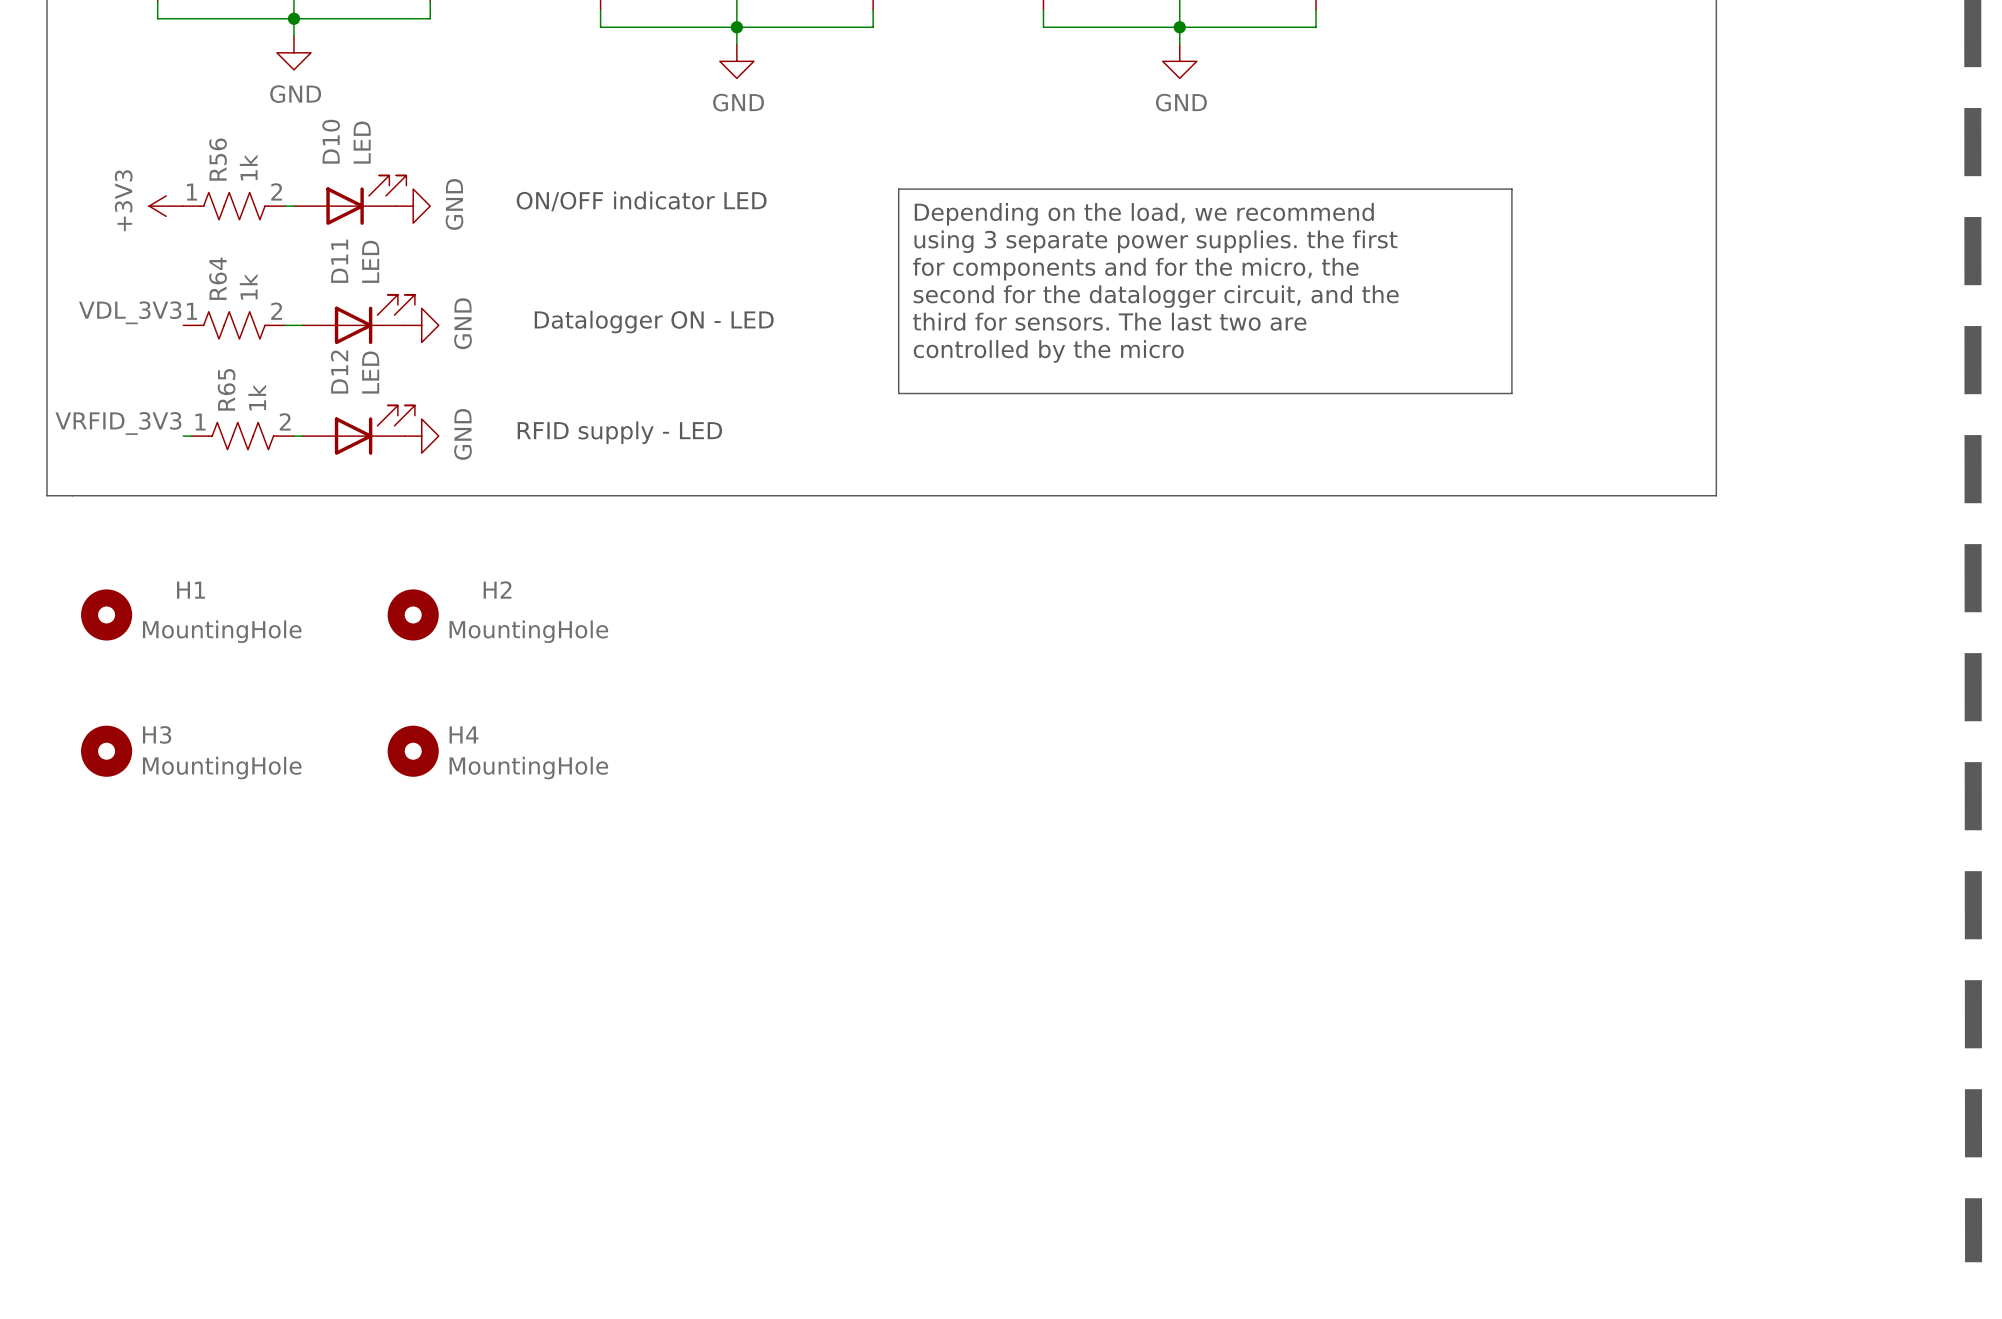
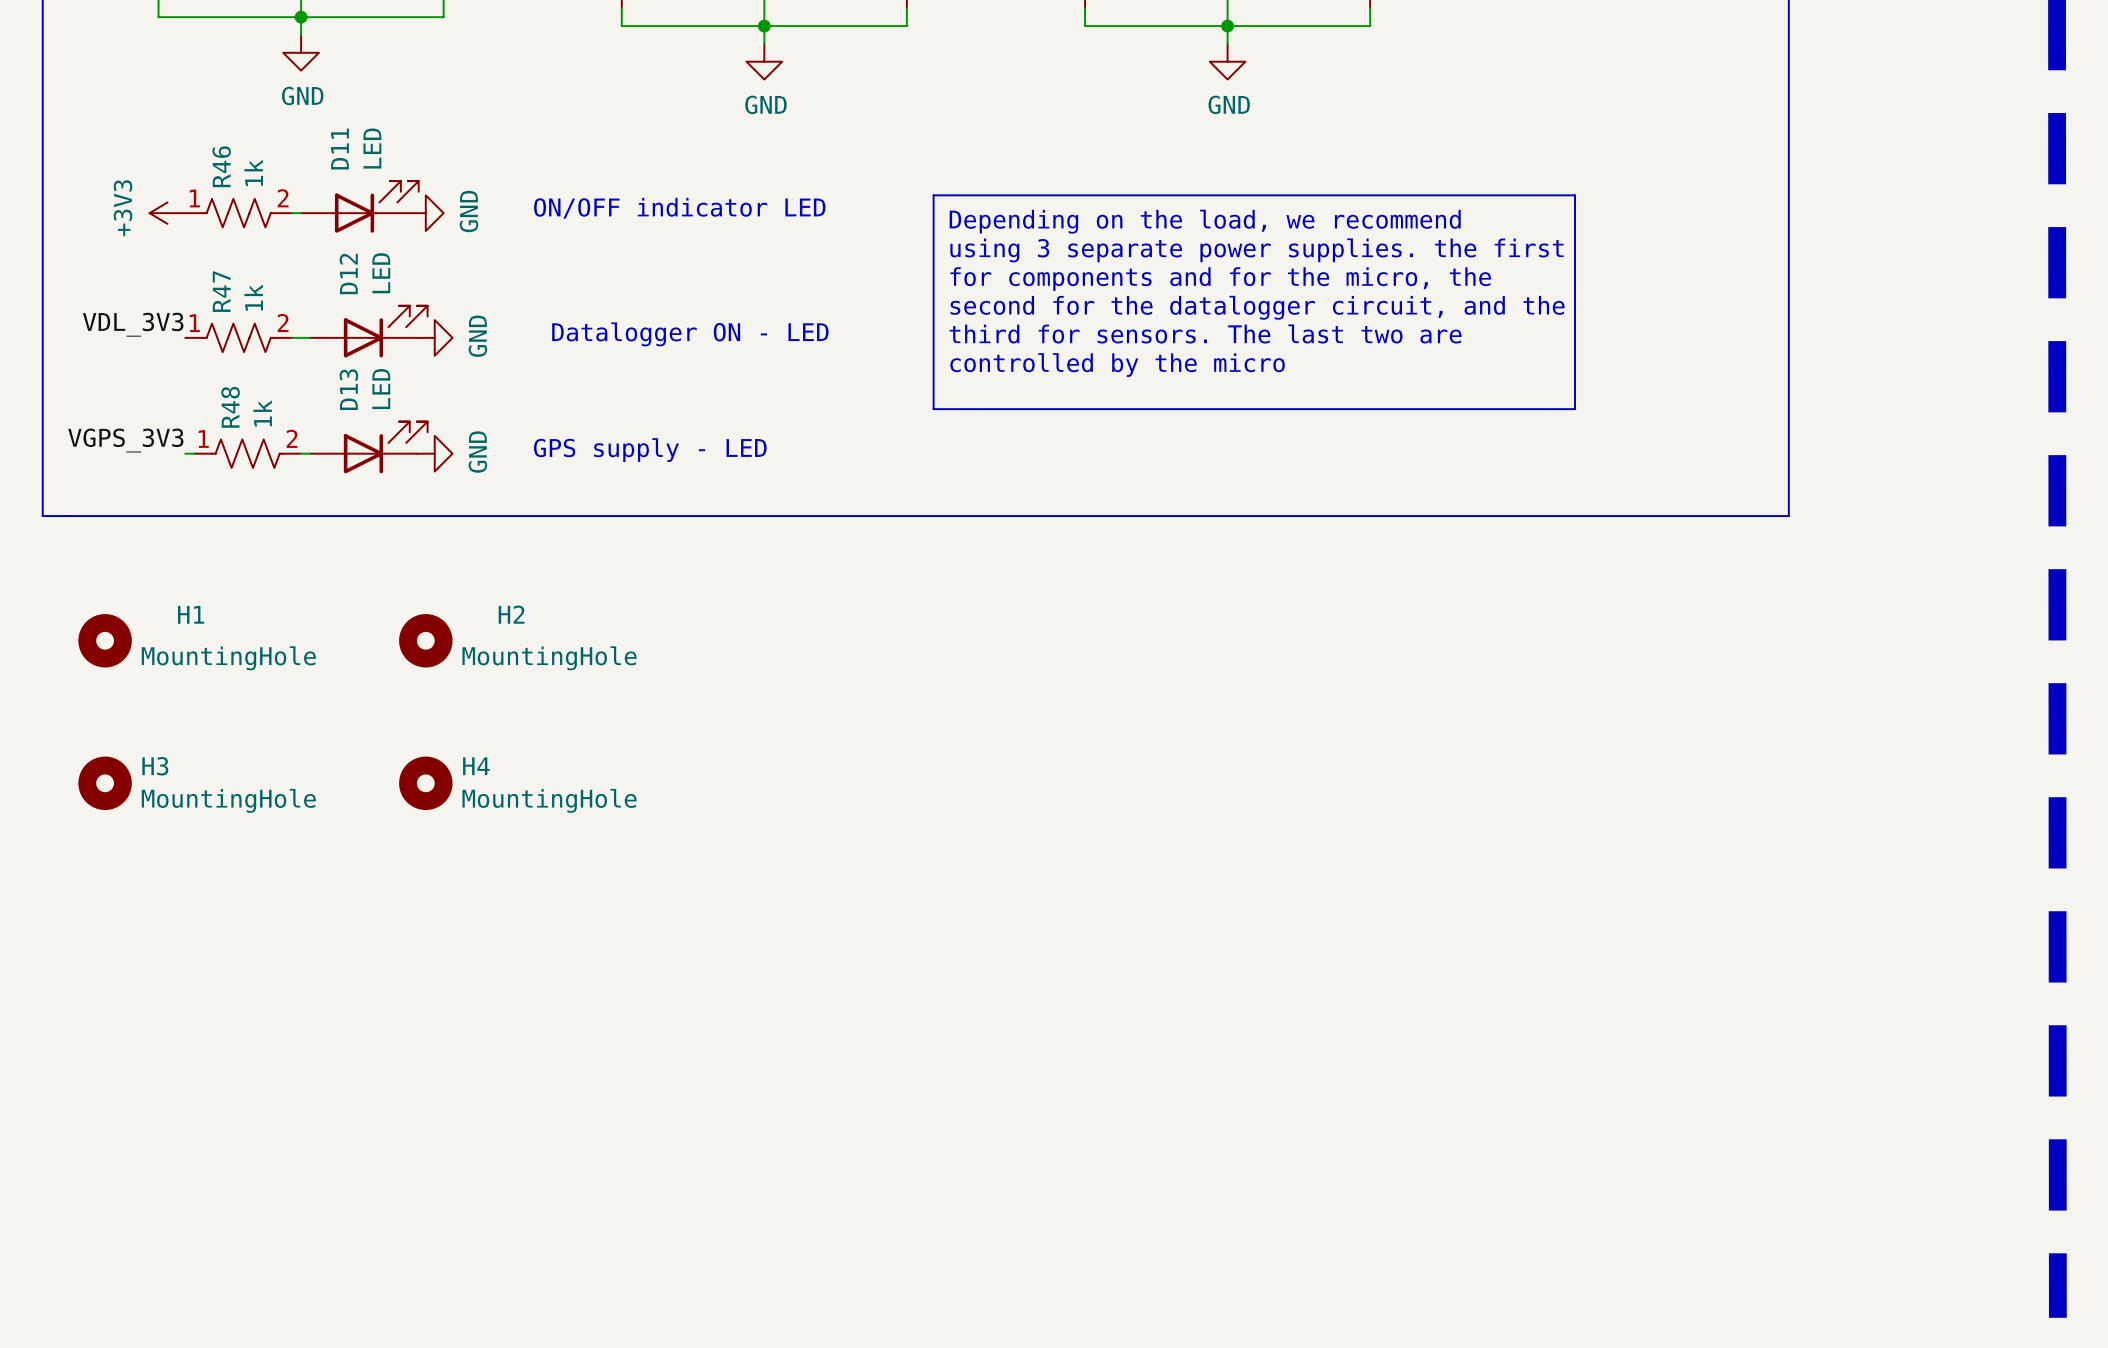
D10 name: D10 (331, 141) -> D11 (339, 149)
R56 name: R56 (218, 159) -> R46 (221, 166)
D11 name: D11 (339, 261) -> D12 (348, 273)
R64 name: R64 (218, 278) -> R47 (221, 291)
D12 name: D12 (339, 372) -> D13 (348, 389)
R65 name: R65 (226, 389) -> R48 (230, 407)
label: VRFID_3V3 (118, 423) -> VGPS_3V3 (125, 440)
text: RFID supply - LED (619, 432) -> GPS supply - LED (650, 450)

